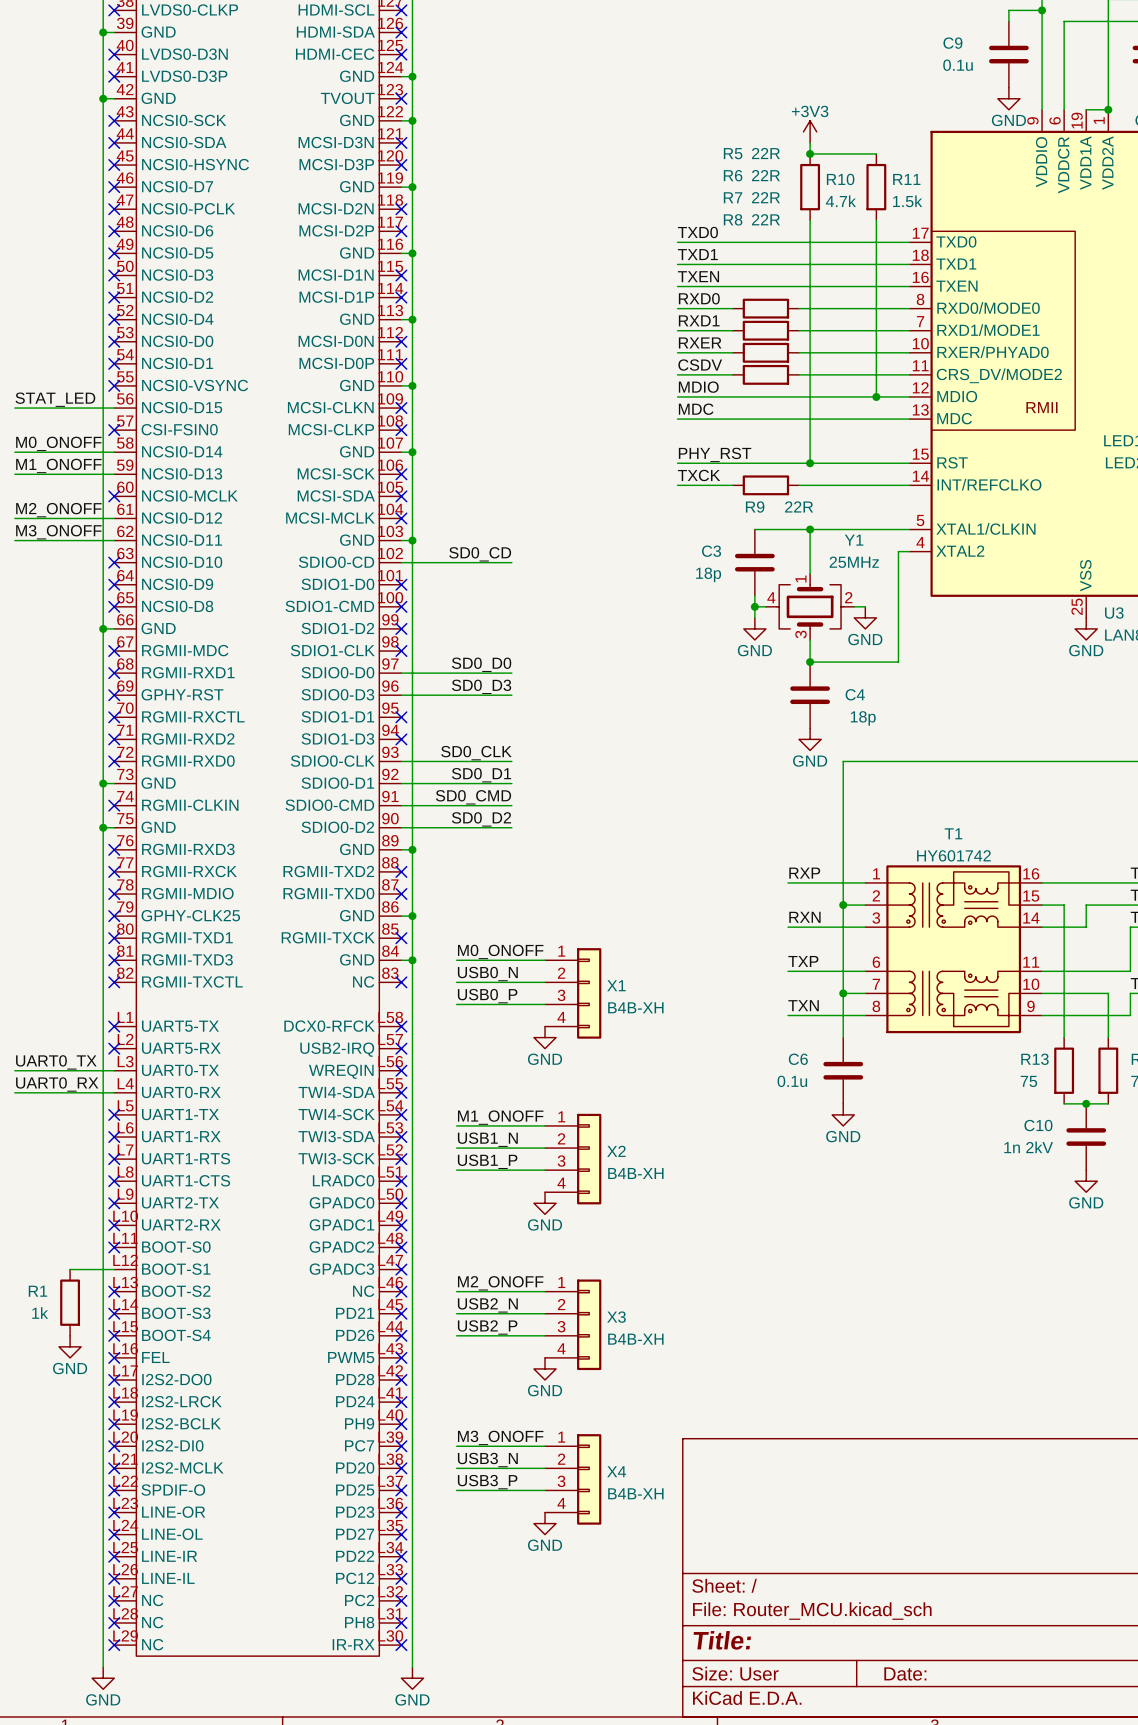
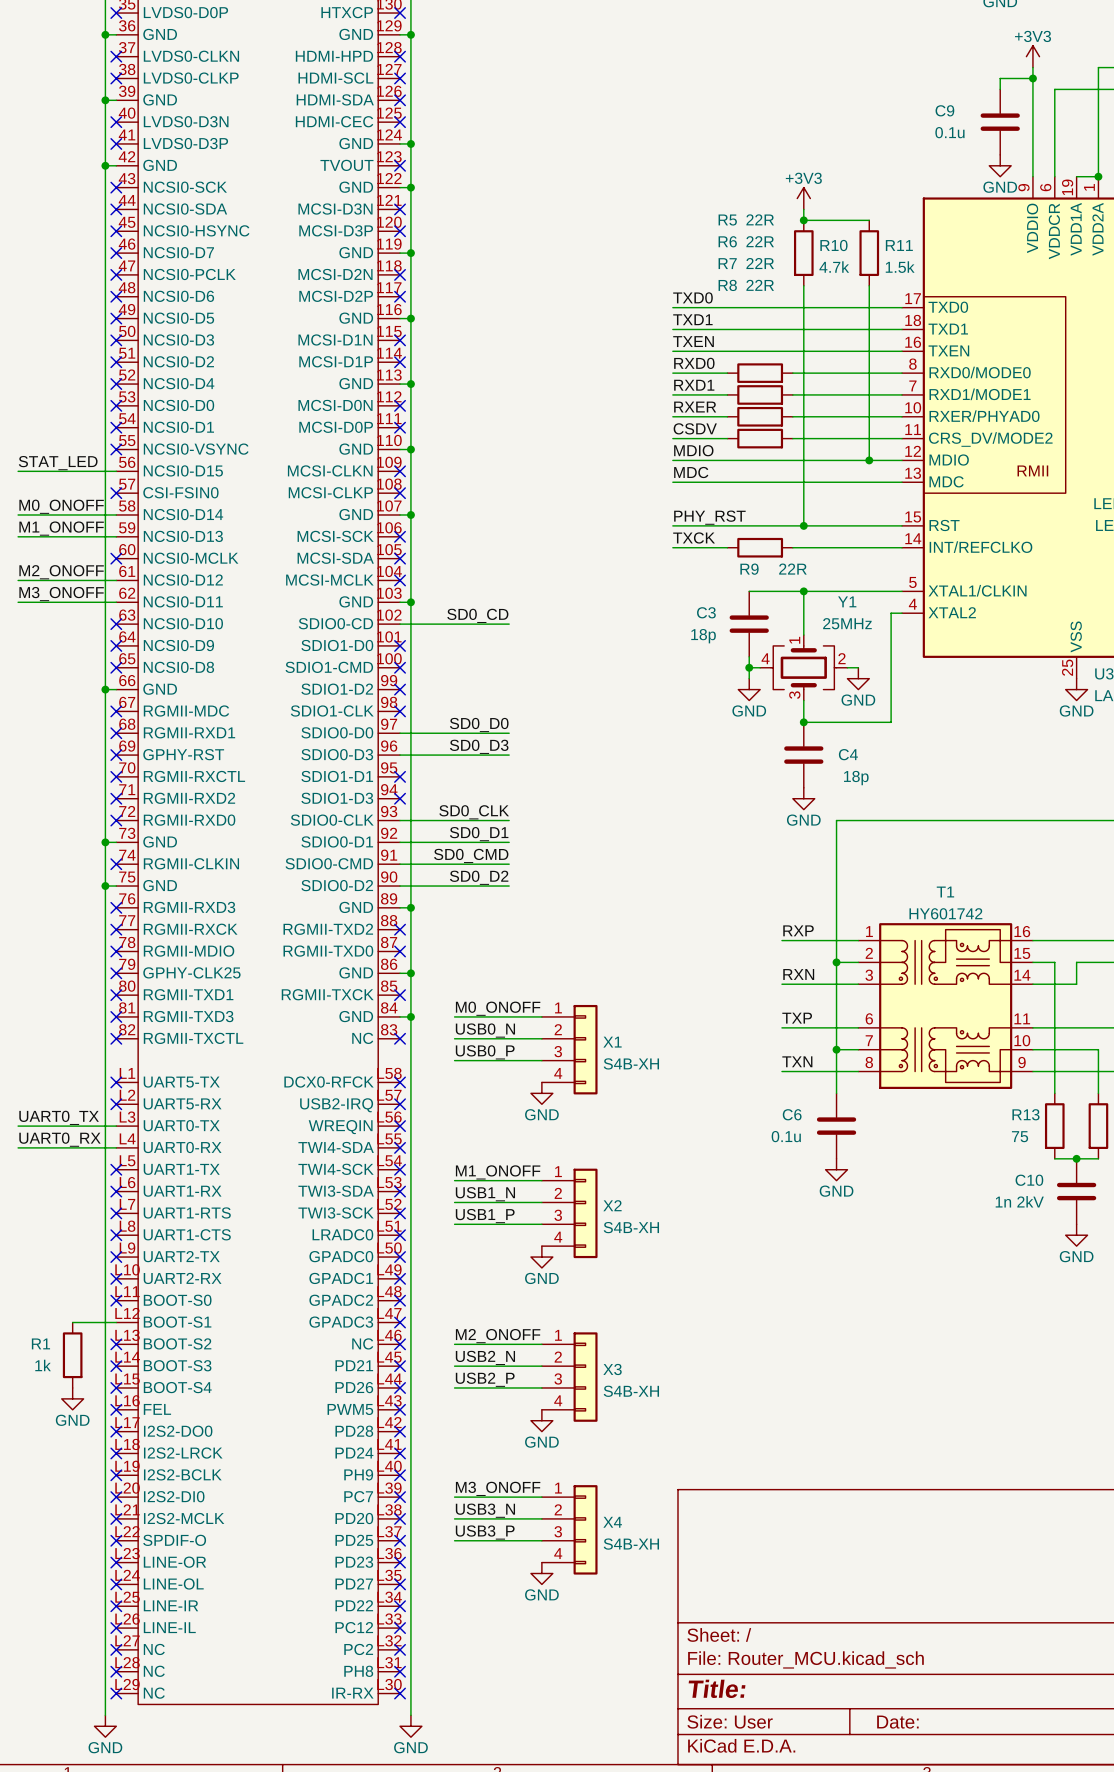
X1 value: B4B-XH (635, 1007) -> S4B-XH (631, 1063)
X2 value: B4B-XH (635, 1173) -> S4B-XH (631, 1227)
X3 value: B4B-XH (635, 1339) -> S4B-XH (631, 1391)
X4 value: B4B-XH (635, 1493) -> S4B-XH (631, 1544)

